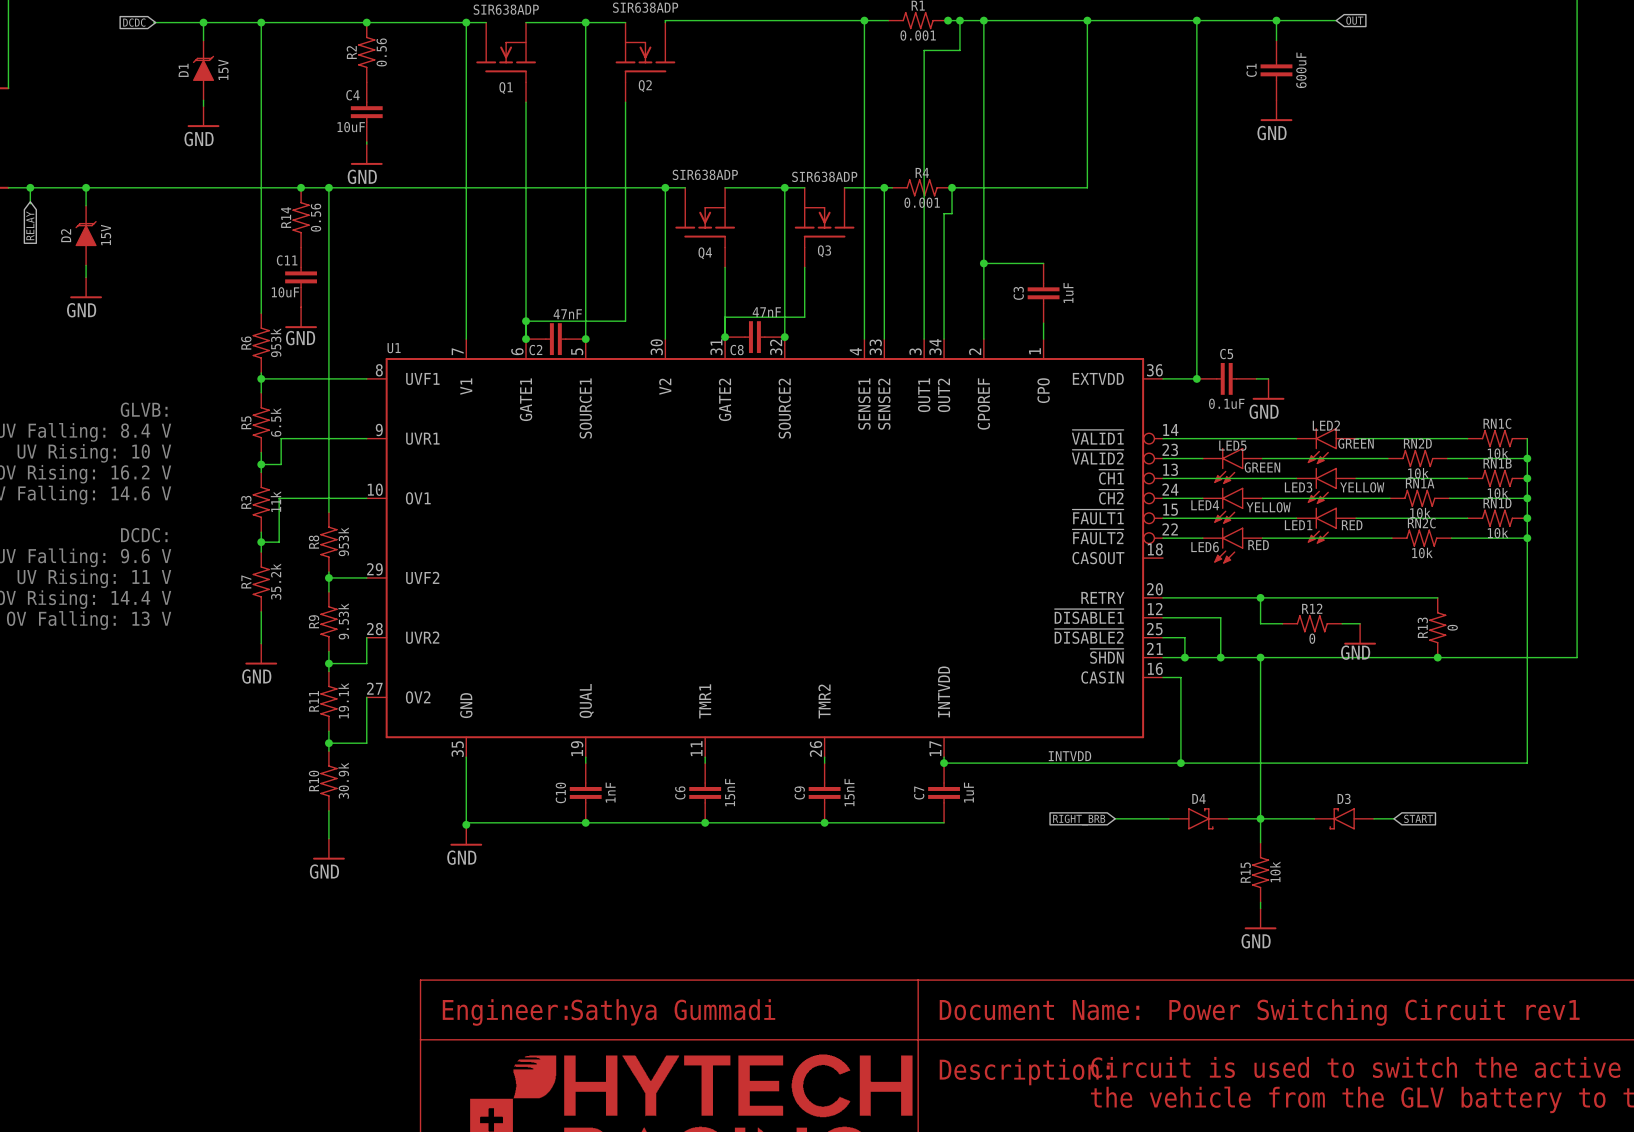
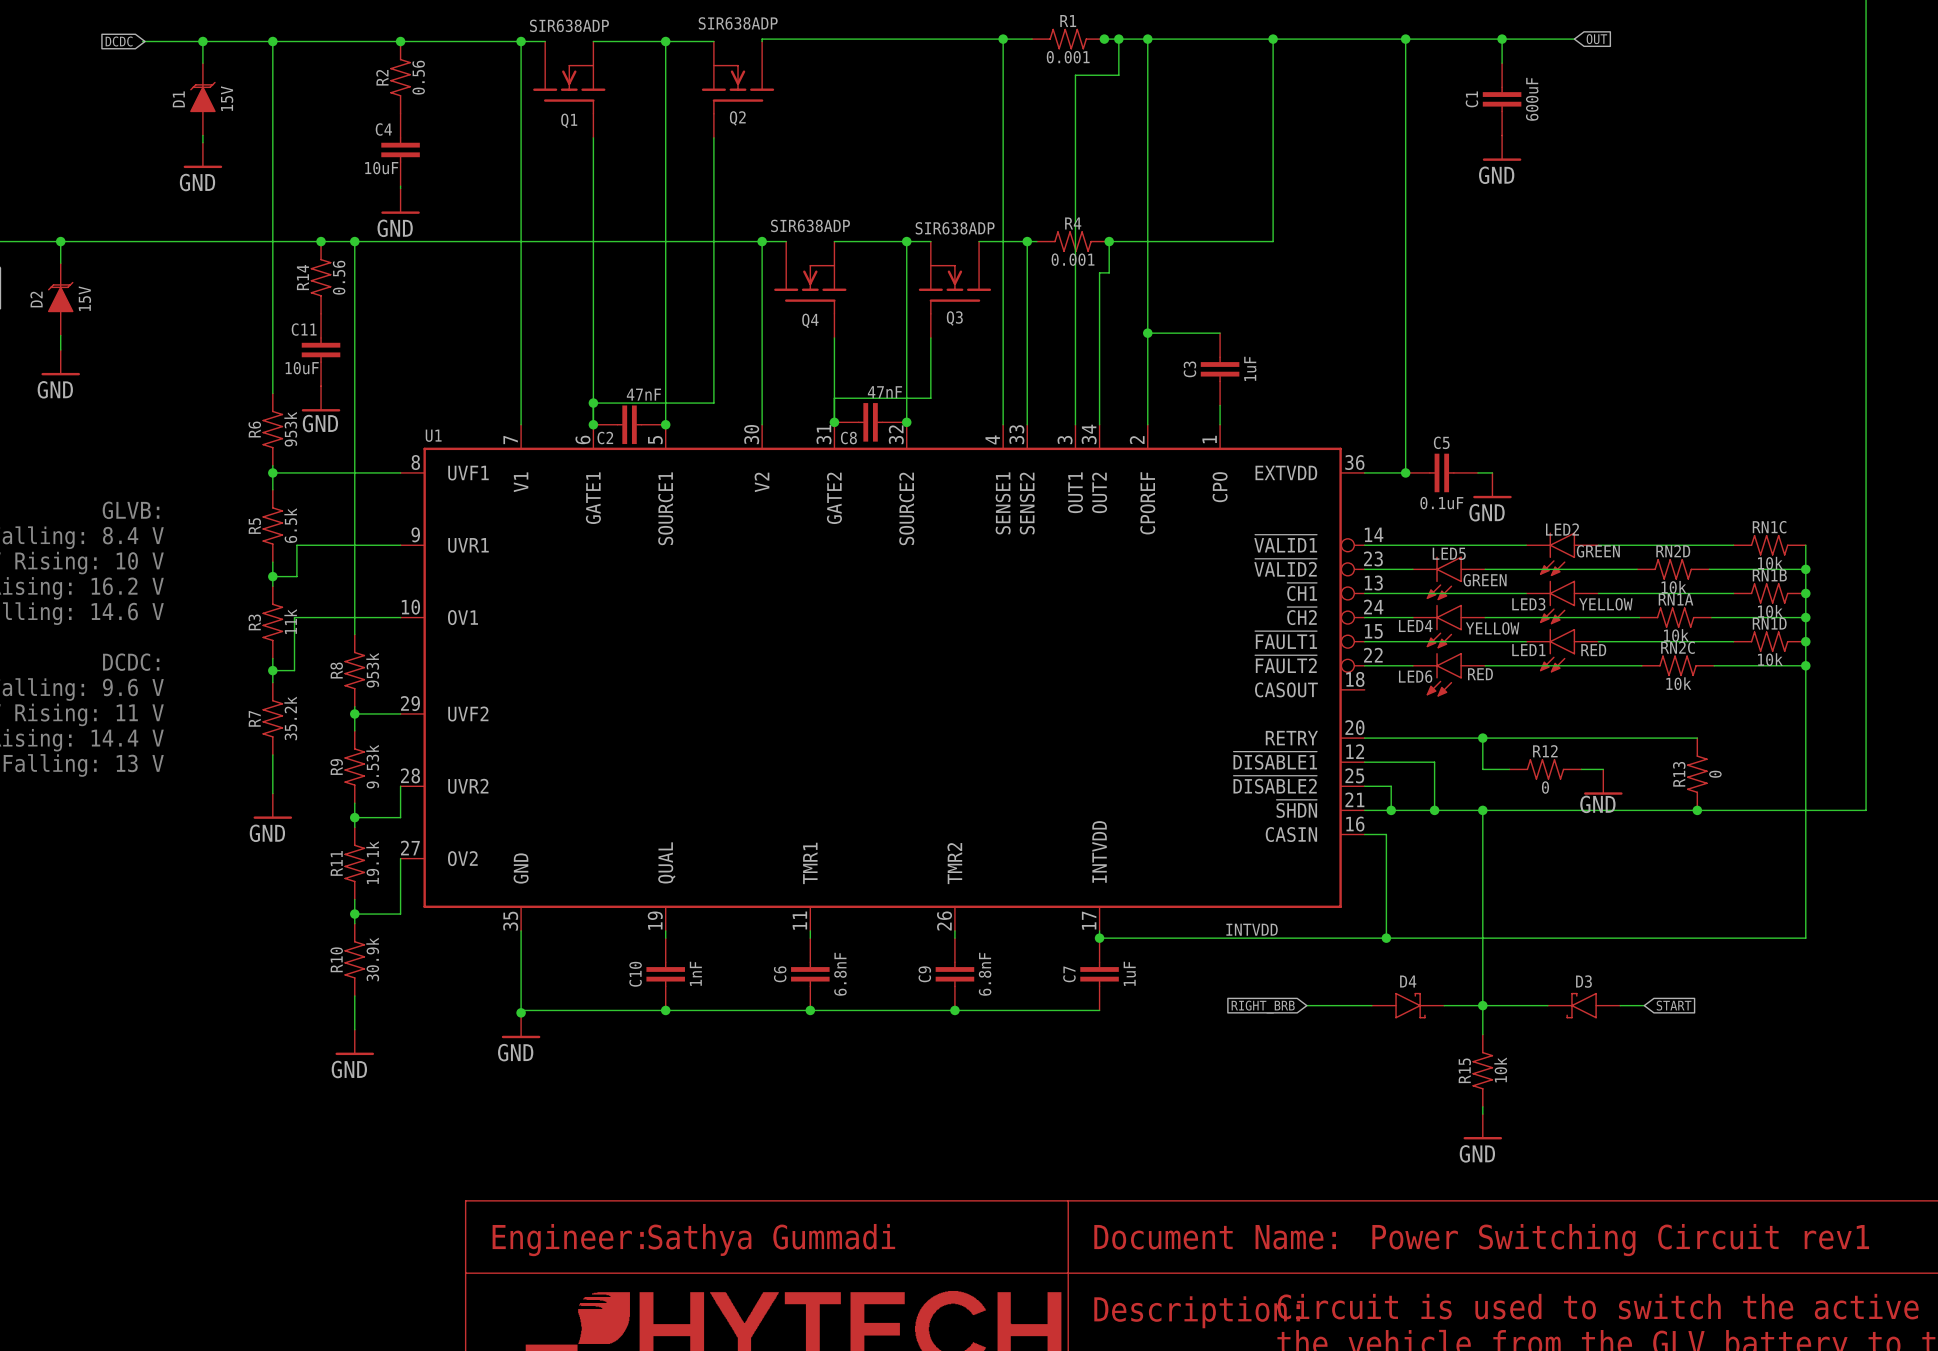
C6 value: 15nF (730, 792) -> 6.8nF (840, 974)
C9 value: 15nF (849, 792) -> 6.8nF (985, 974)

